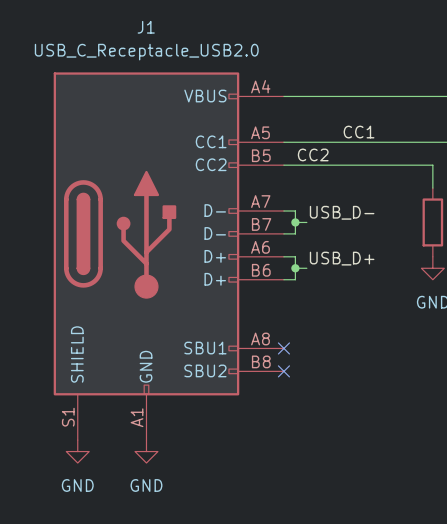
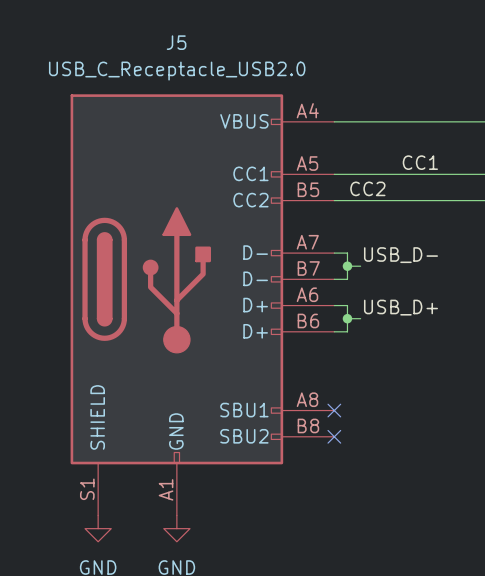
J1 name: J1 (146, 27) -> J5 (176, 42)

